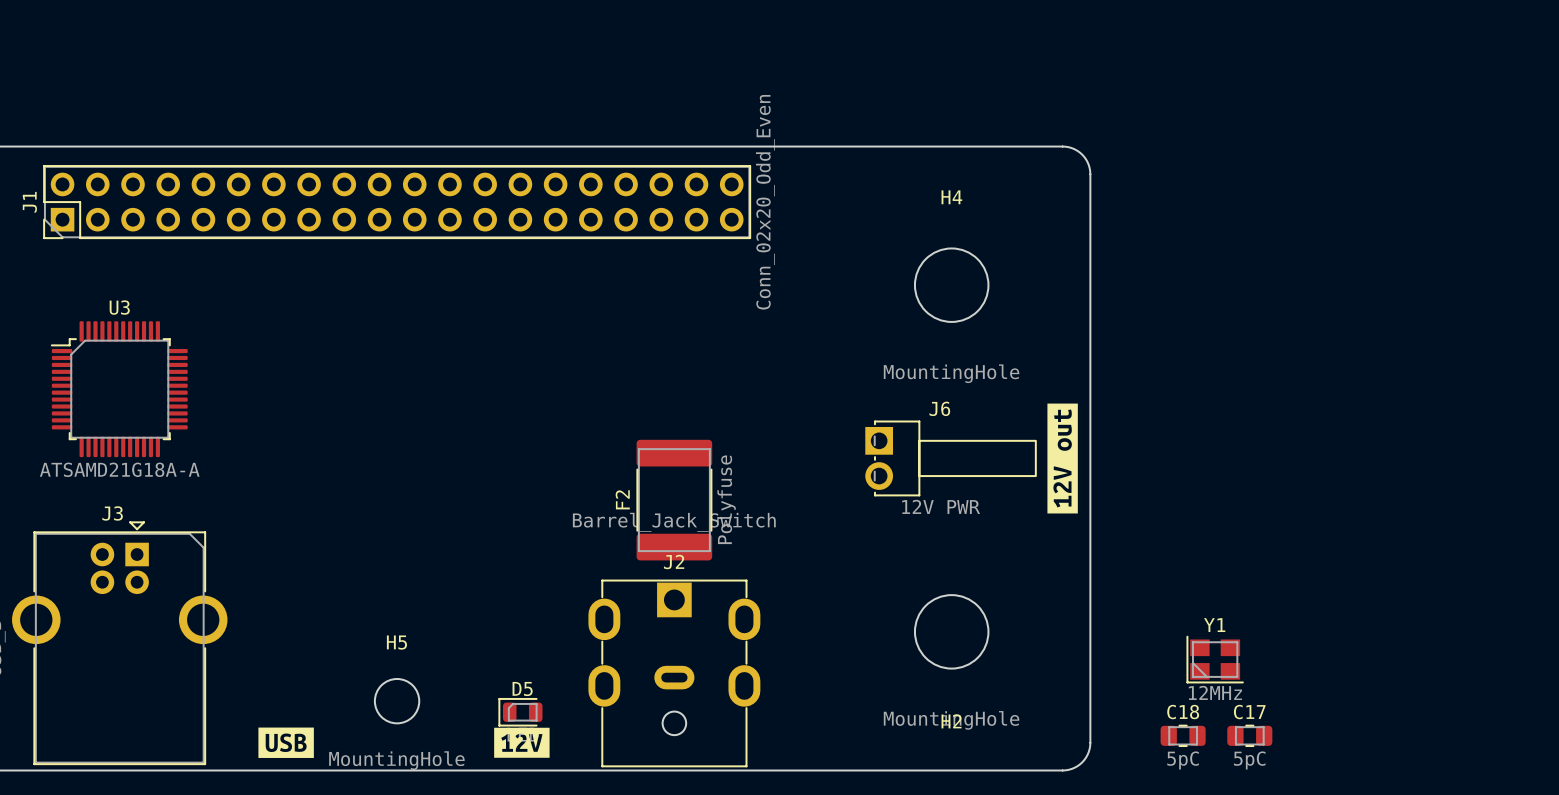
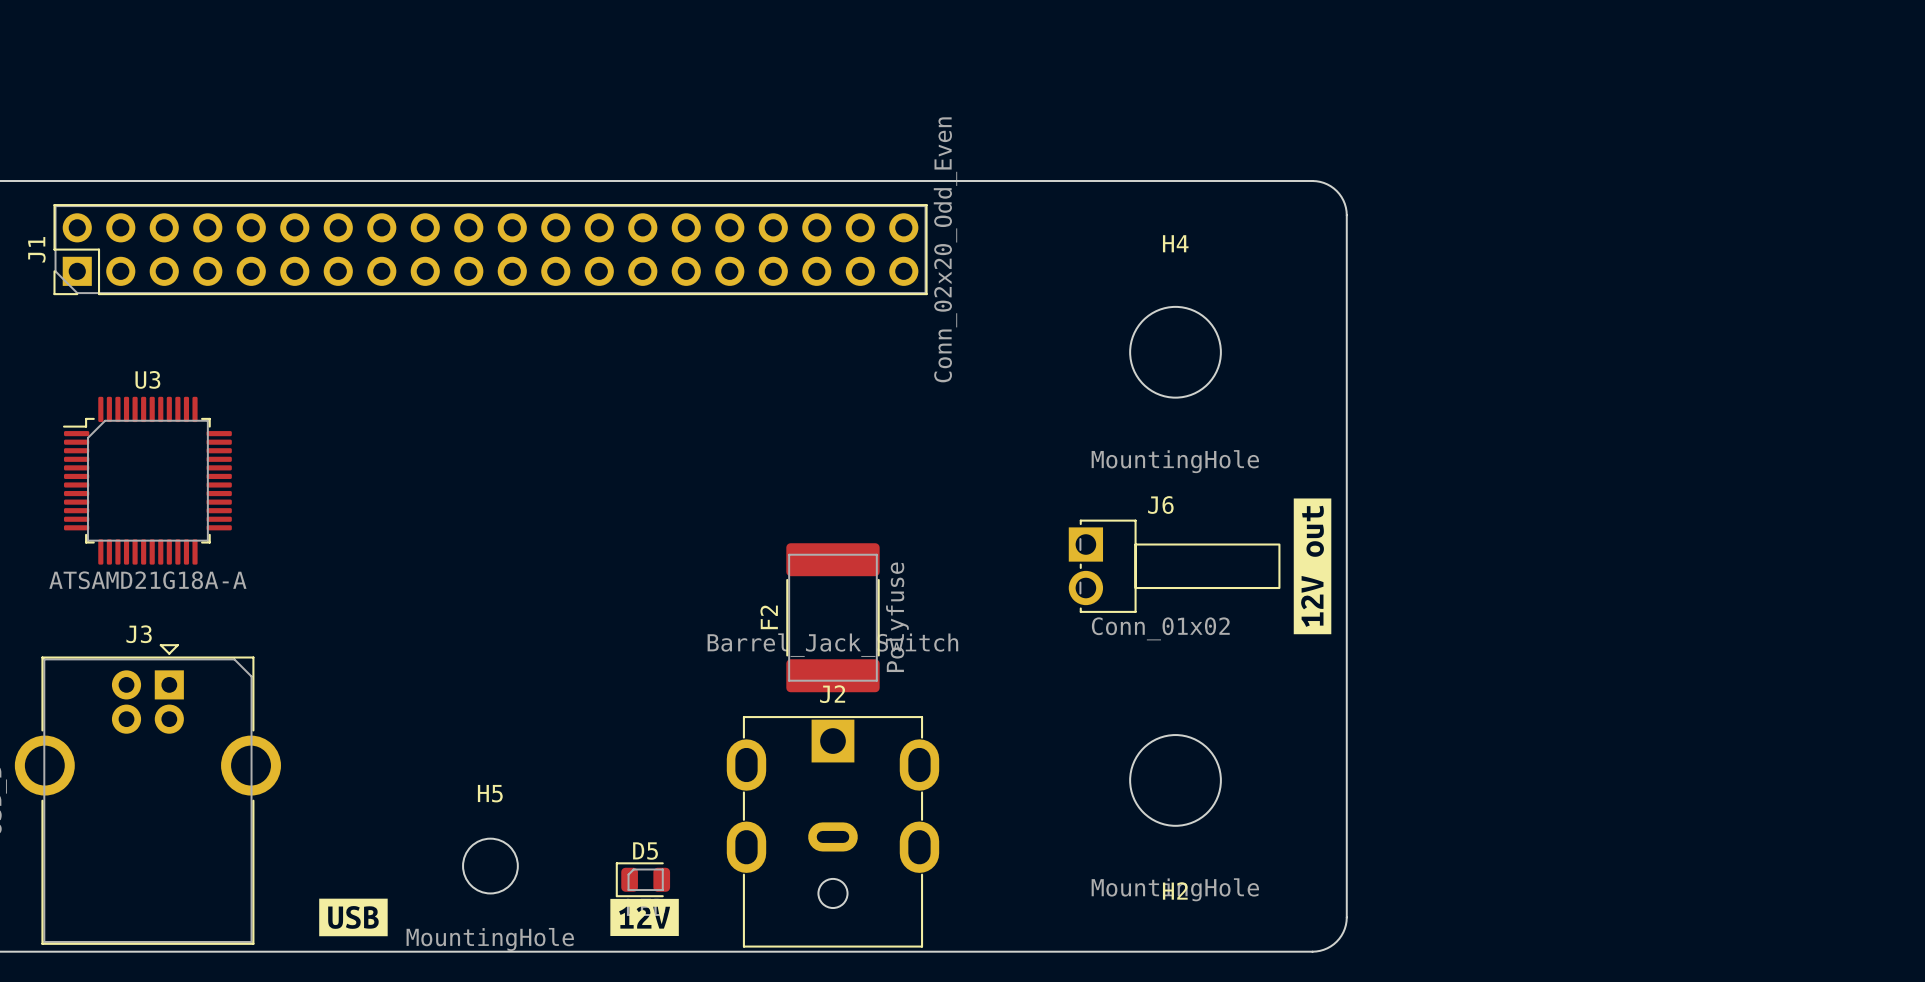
J6 value: 12V PWR (941, 506) -> Conn_01x02 (1160, 628)
Y1: 12MHz (1215, 659) -> none
C18: 5pC (1183, 735) -> none
C17: 5pC (1249, 735) -> none

